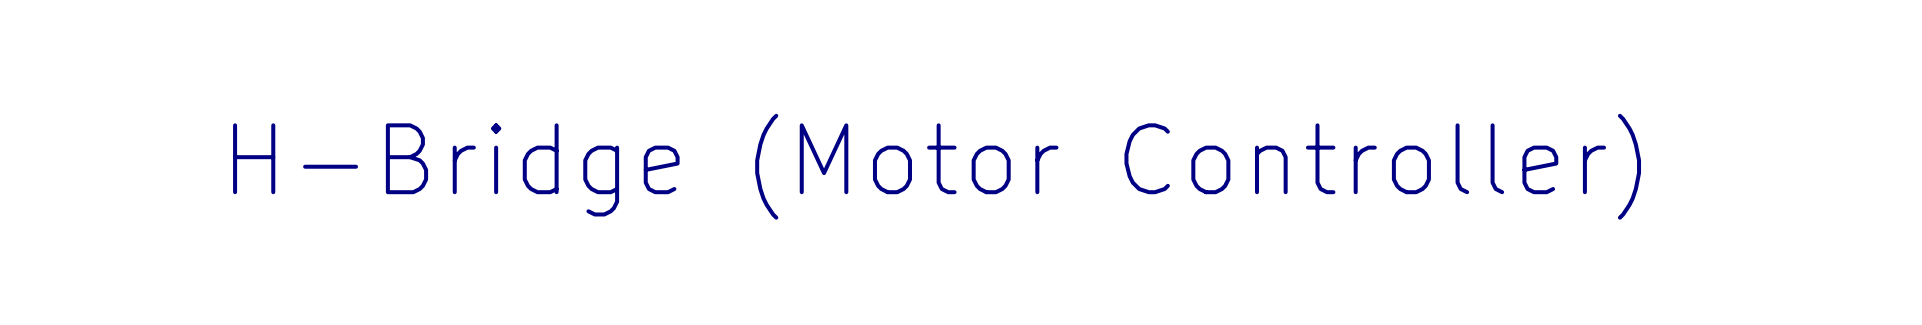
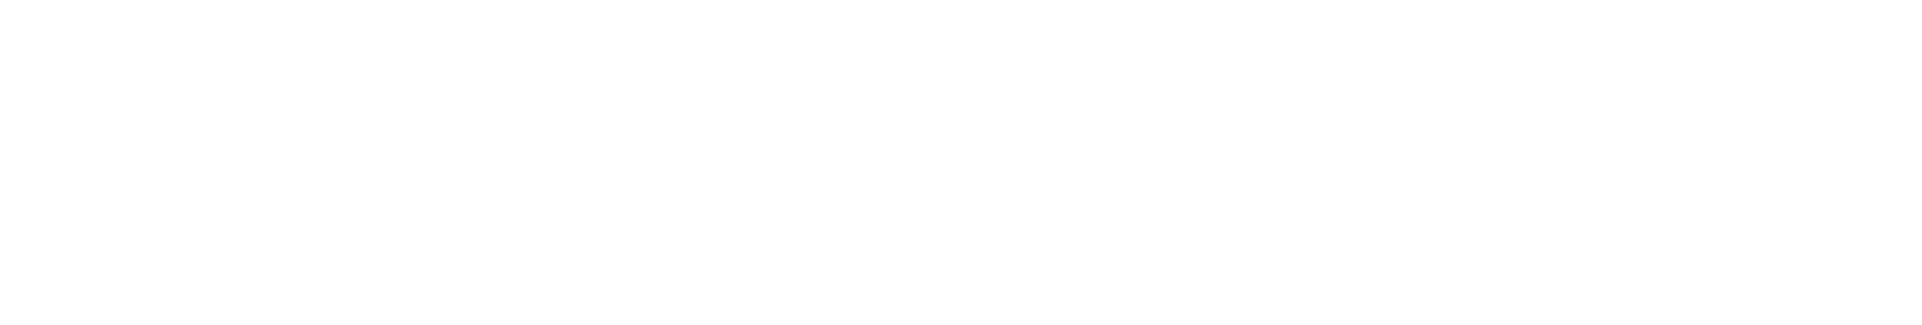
text: H-Bridge (Motor Controller) (937, 166) -> none

